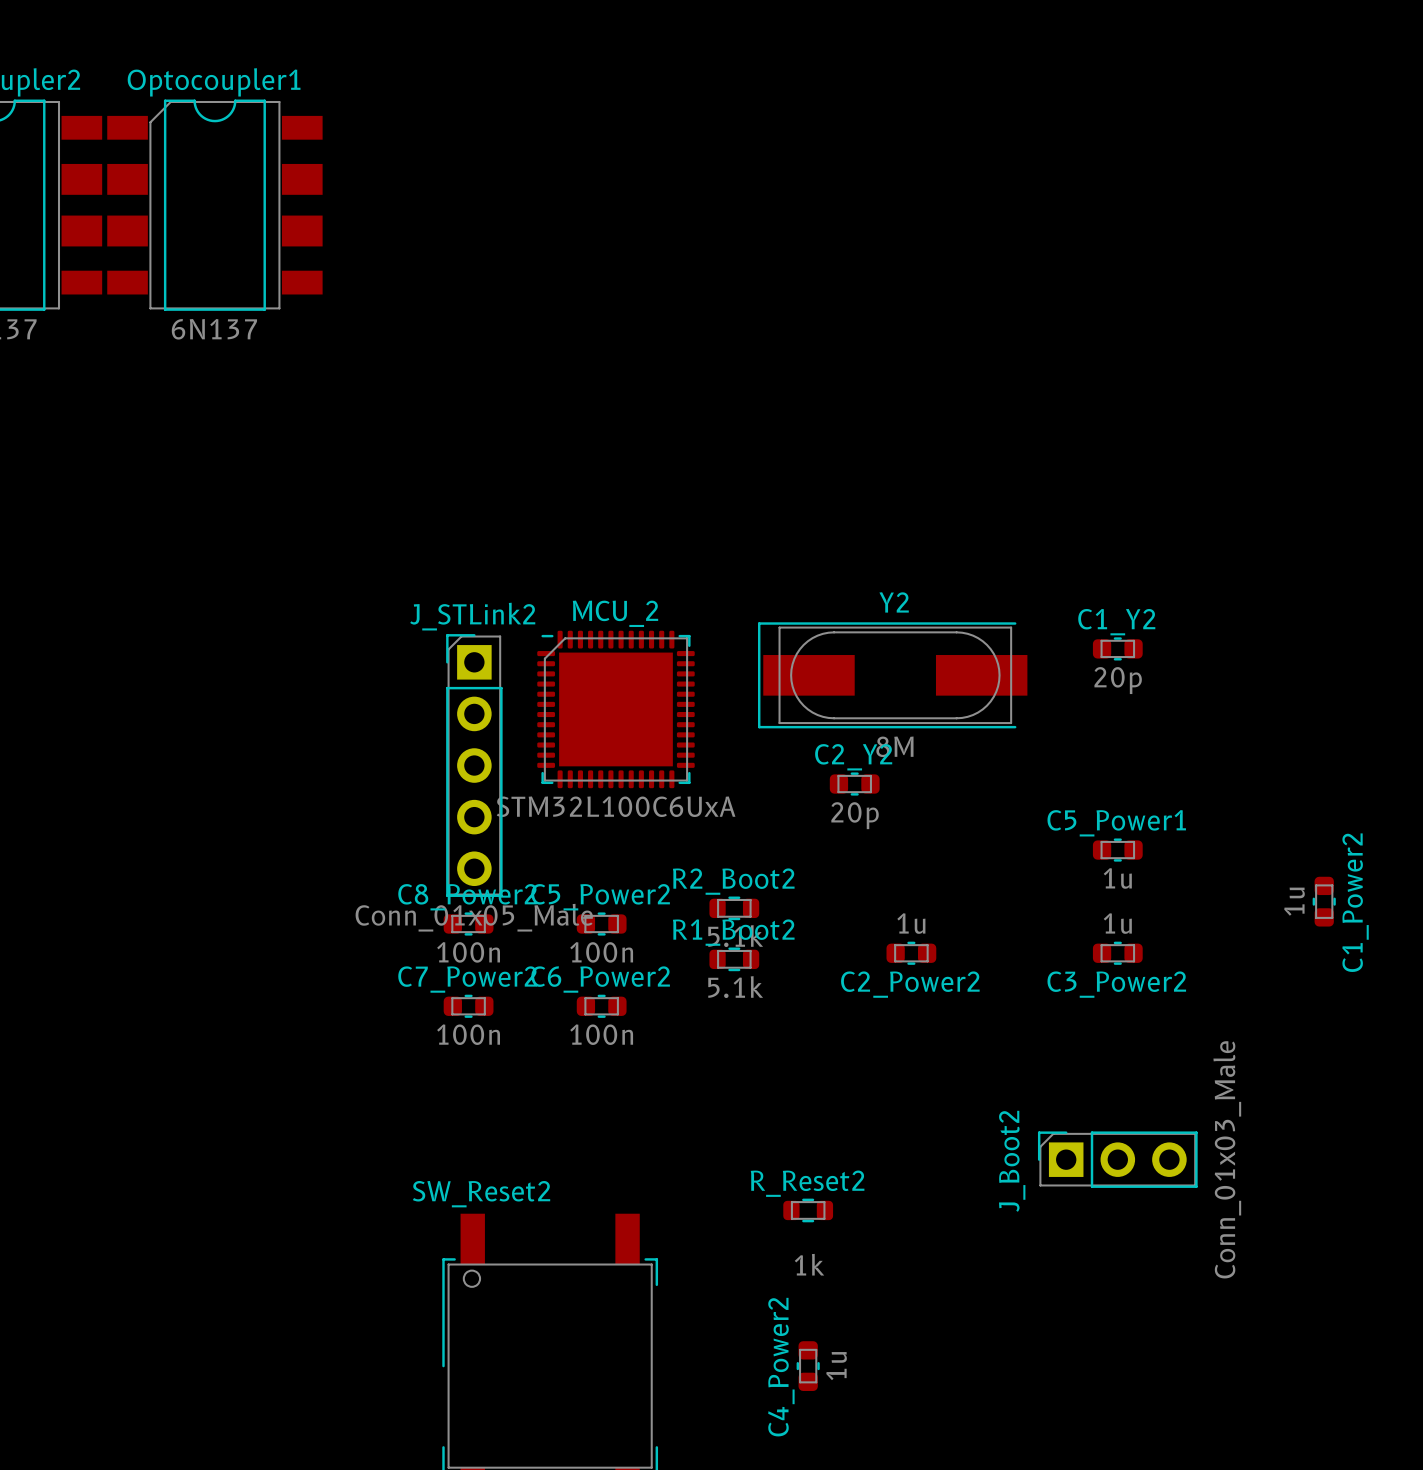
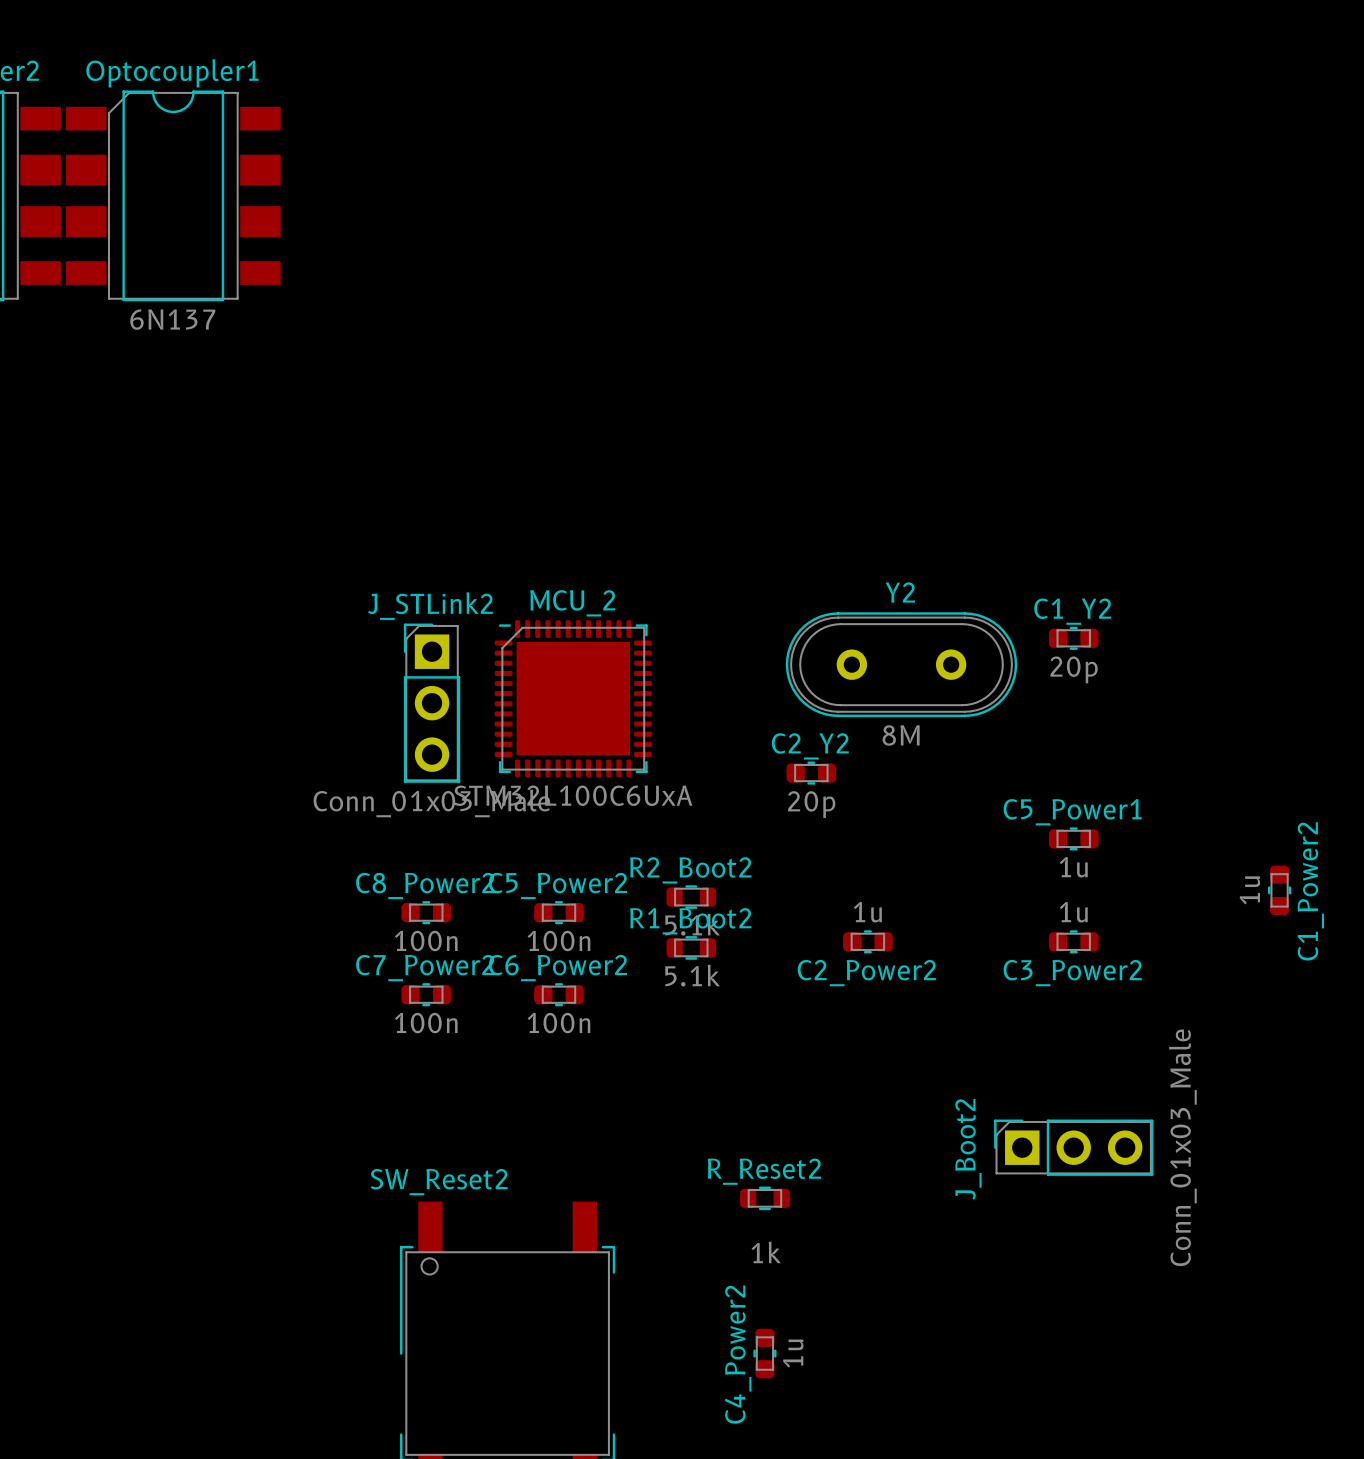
Y2 footprint: [757, 622, 1028, 729] -> [785, 612, 1018, 718]
J_STLink2 footprint: [446, 634, 503, 897] -> [403, 623, 461, 783]
J_STLink2 value: Conn_01x05_Male (474, 917) -> Conn_01x03_Male (431, 803)

